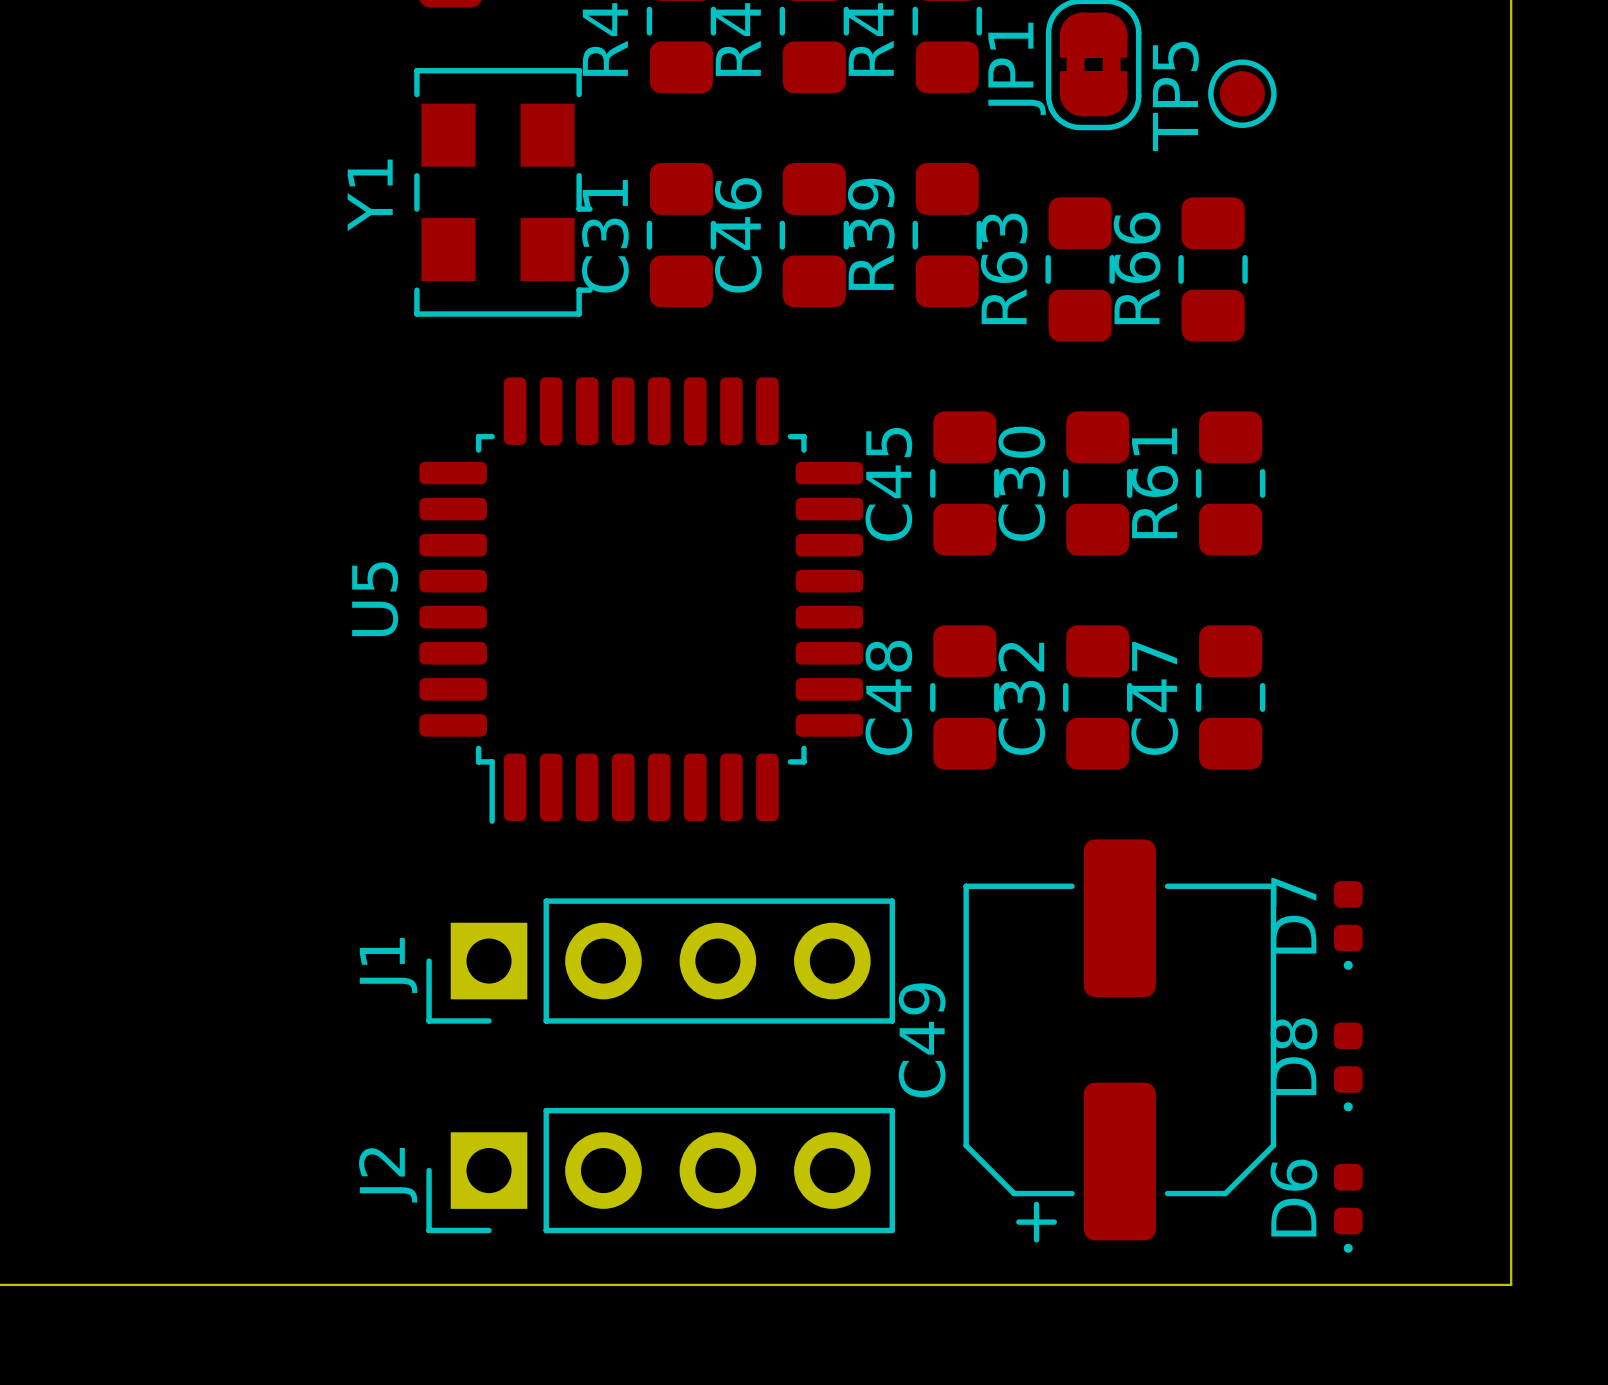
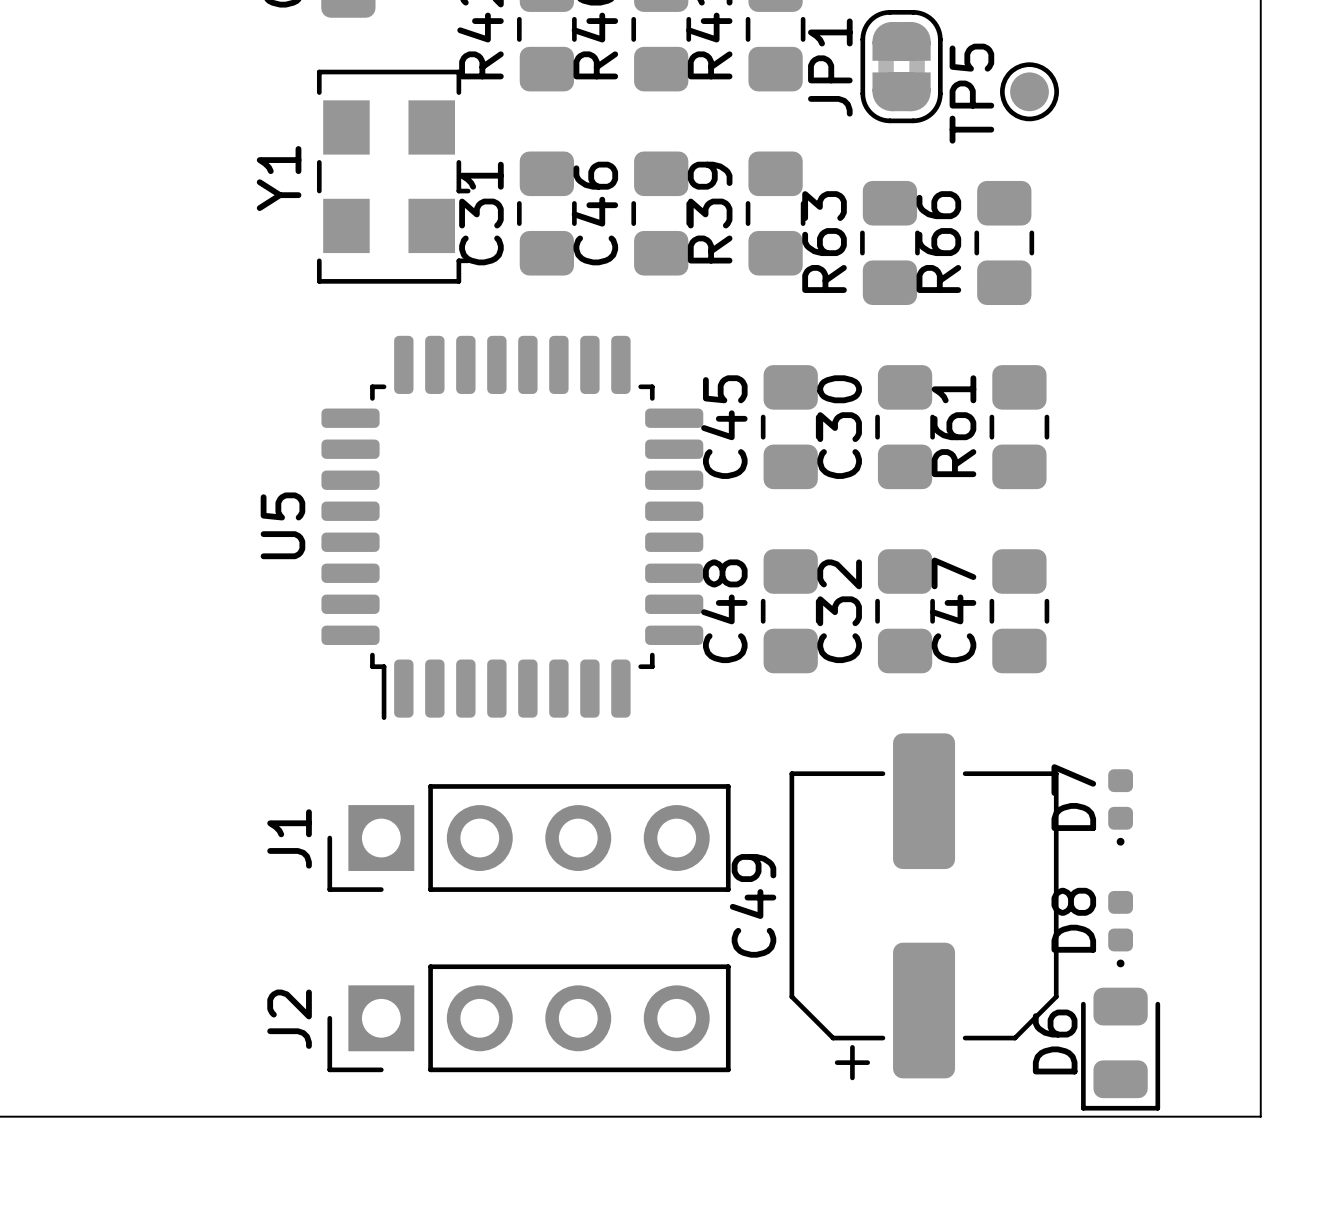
D6 footprint: [1333, 1164, 1363, 1253] -> [1081, 987, 1161, 1111]

